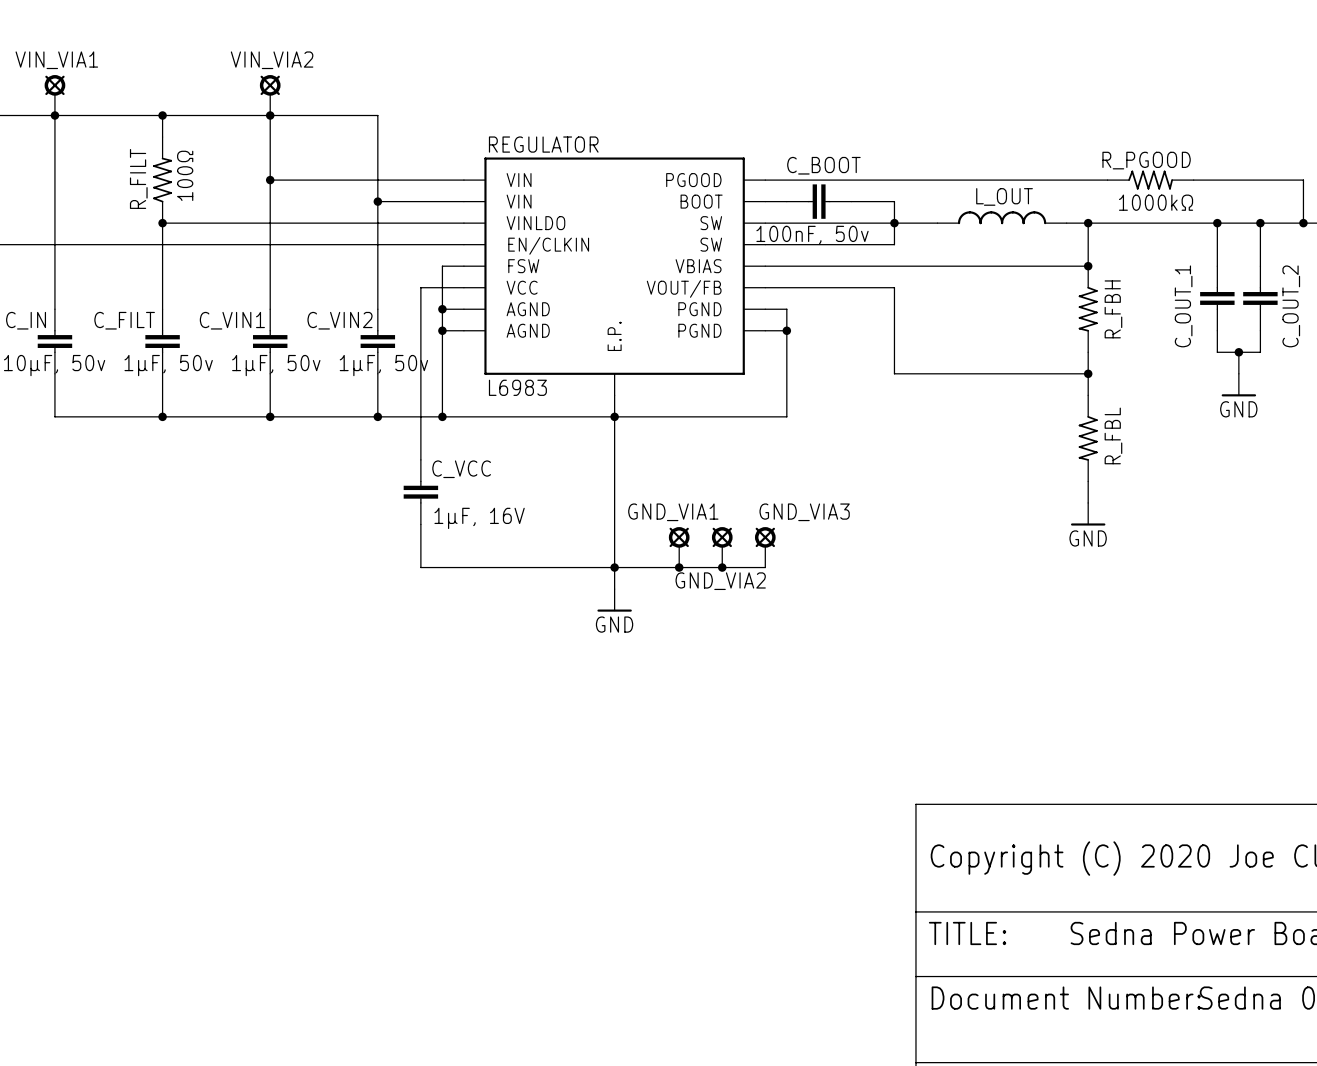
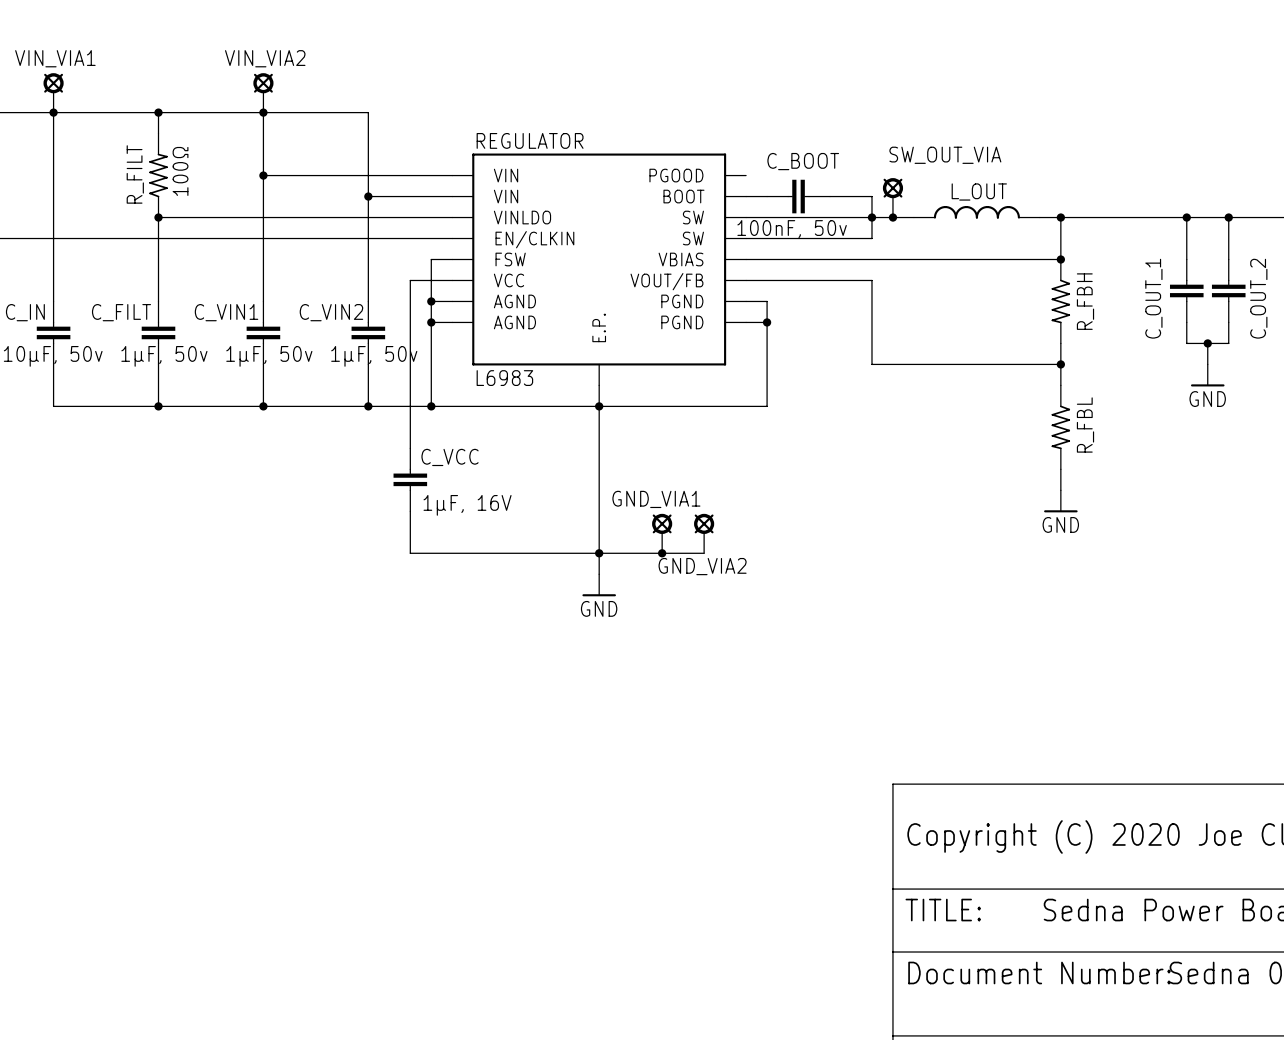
wire: (765, 180) (1107, 180) -> none
R_PGOOD: 1000kΩ (1150, 180) -> none
wire: (1193, 180) (1303, 180) (1303, 223) -> none
SW_OUT_VIA: none -> (892, 197)
junction: none -> (892, 217)
junction: (1303, 223) -> none
GND_VIA3: (765, 547) -> none
wire: (722, 567) (765, 567) -> none
junction: (722, 567) -> none

